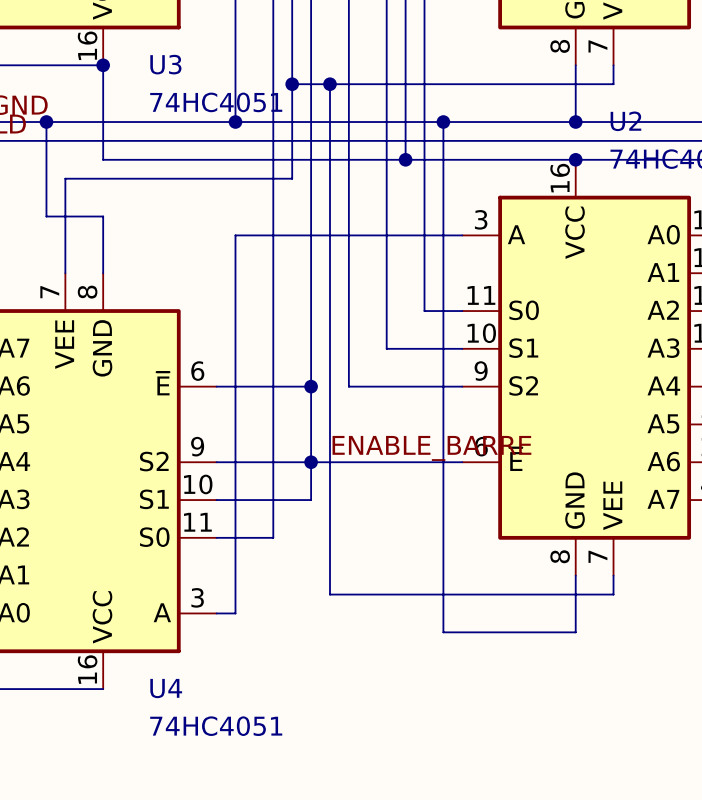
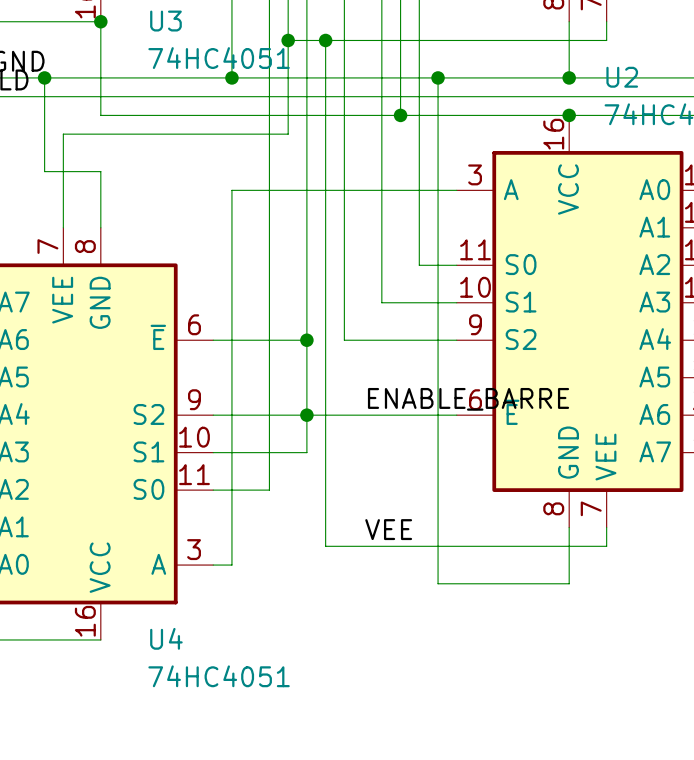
label position: ENABLE_BARRE (431, 448) -> ENABLE_BARRE (468, 399)
label: none -> VEE (388, 529)

